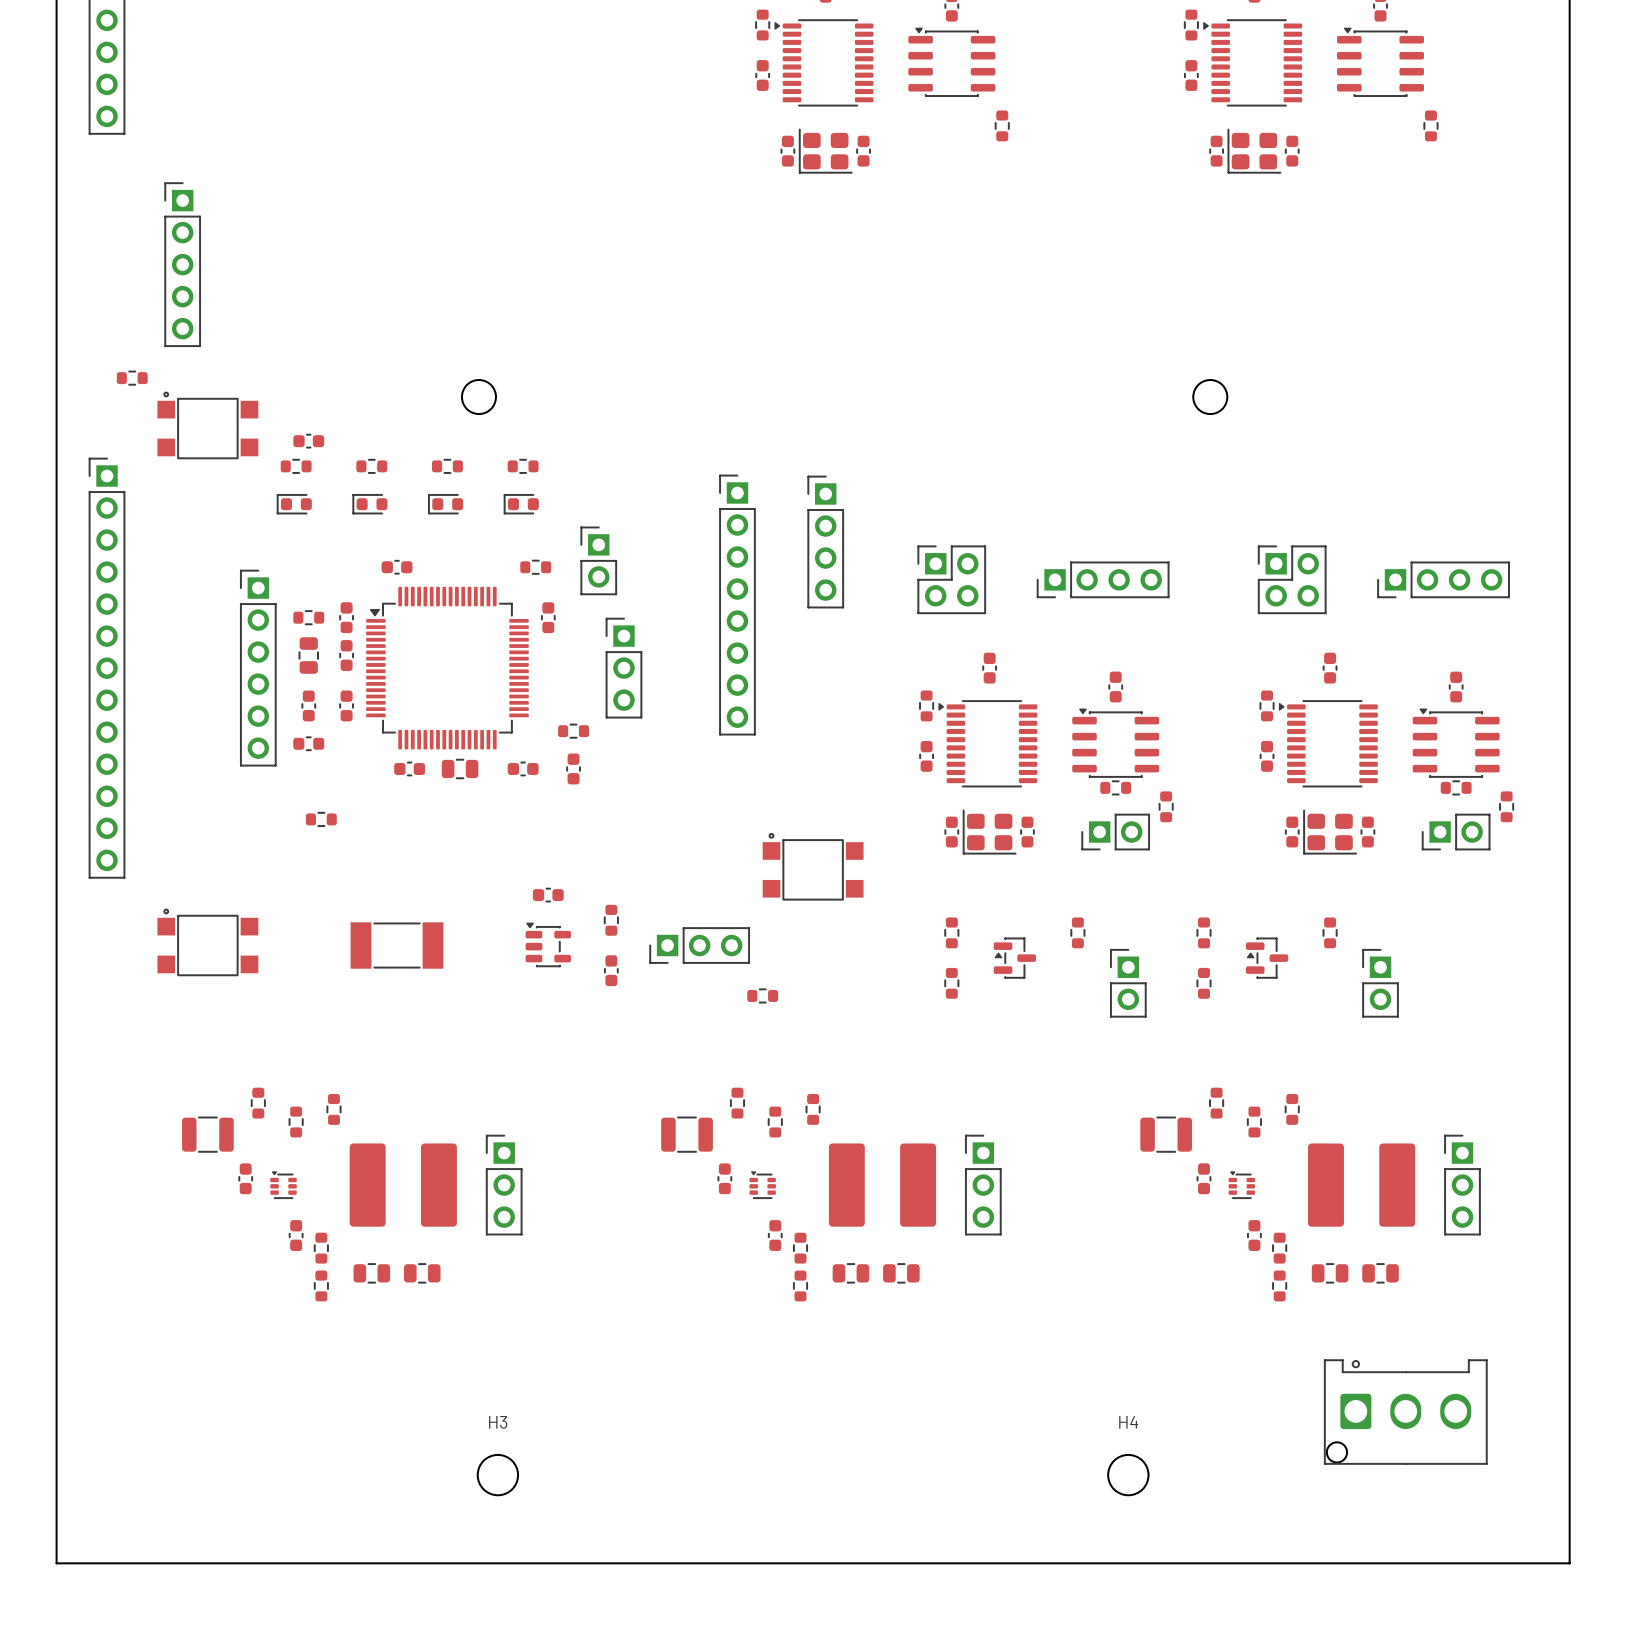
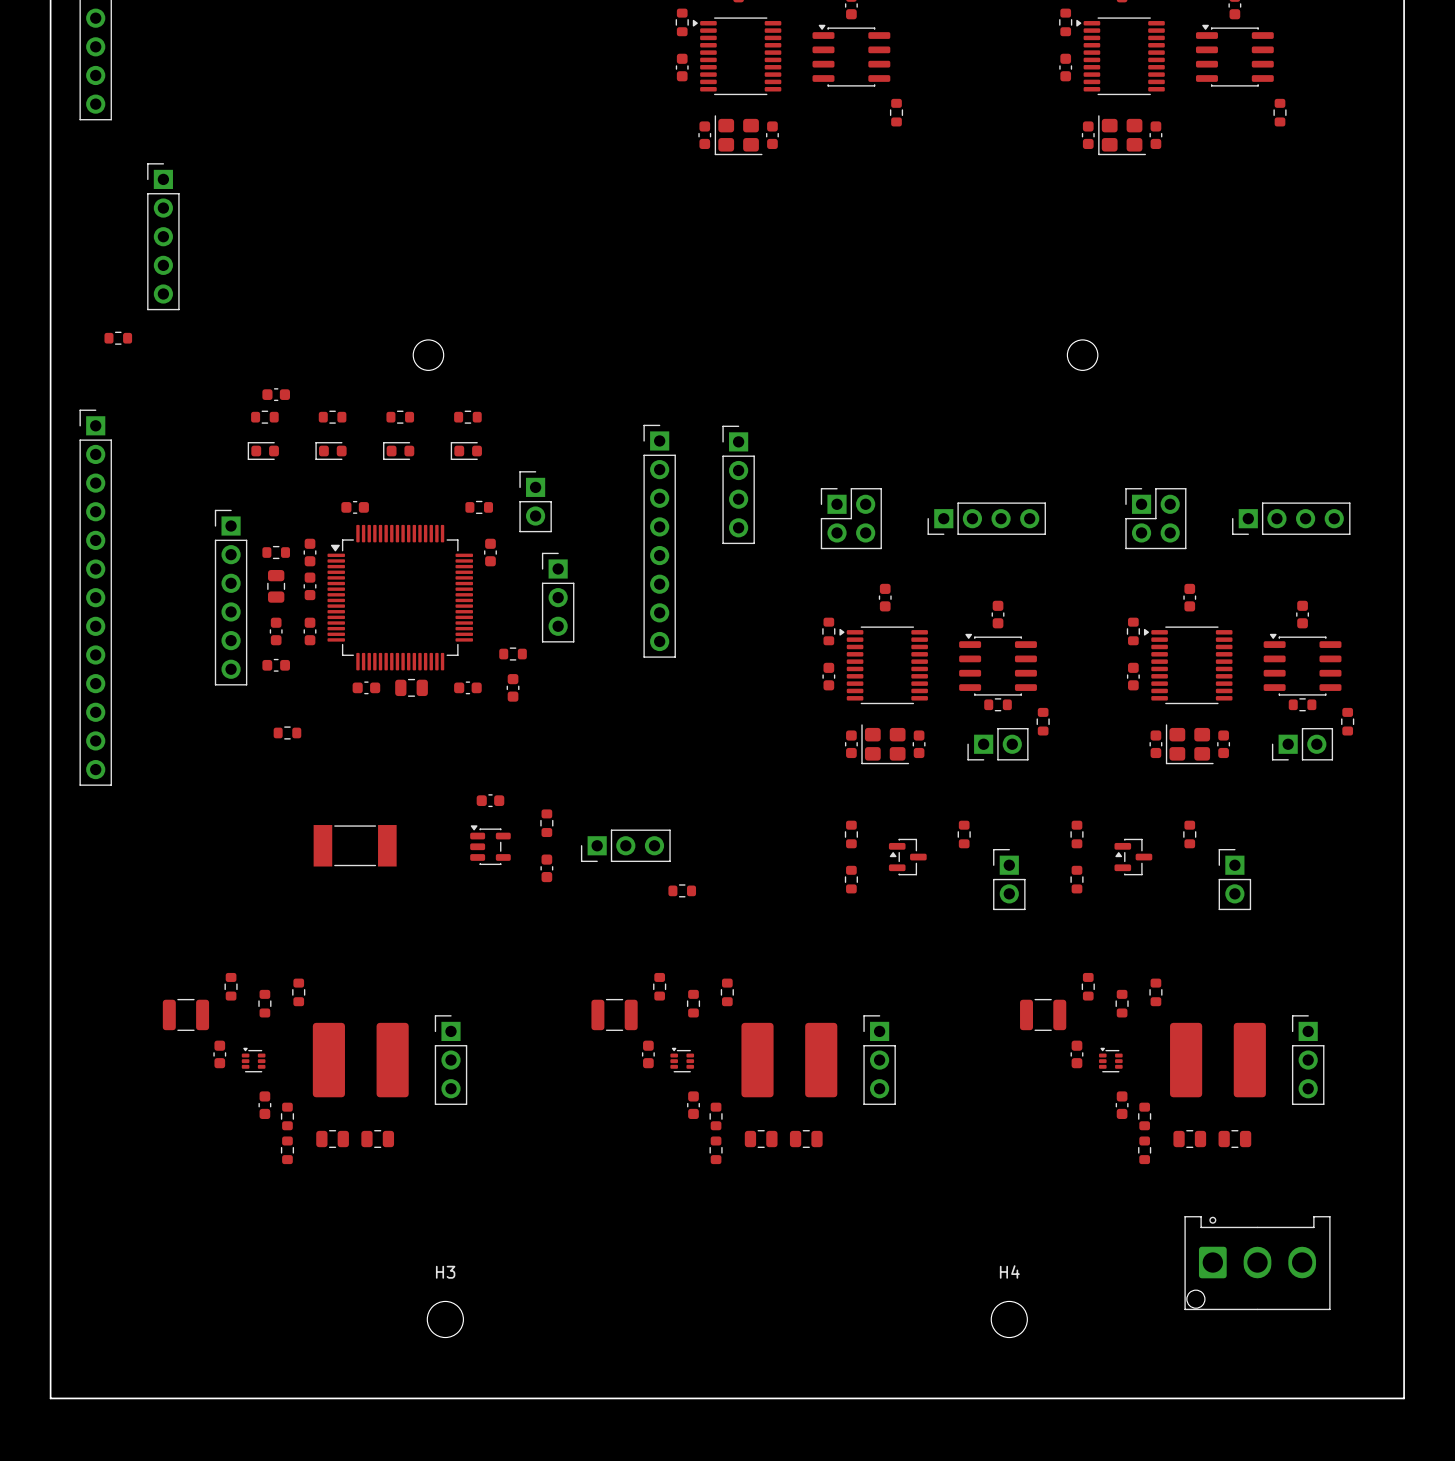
part: (207, 425) -> none
part: (813, 866) -> none
part: (207, 942) -> none

